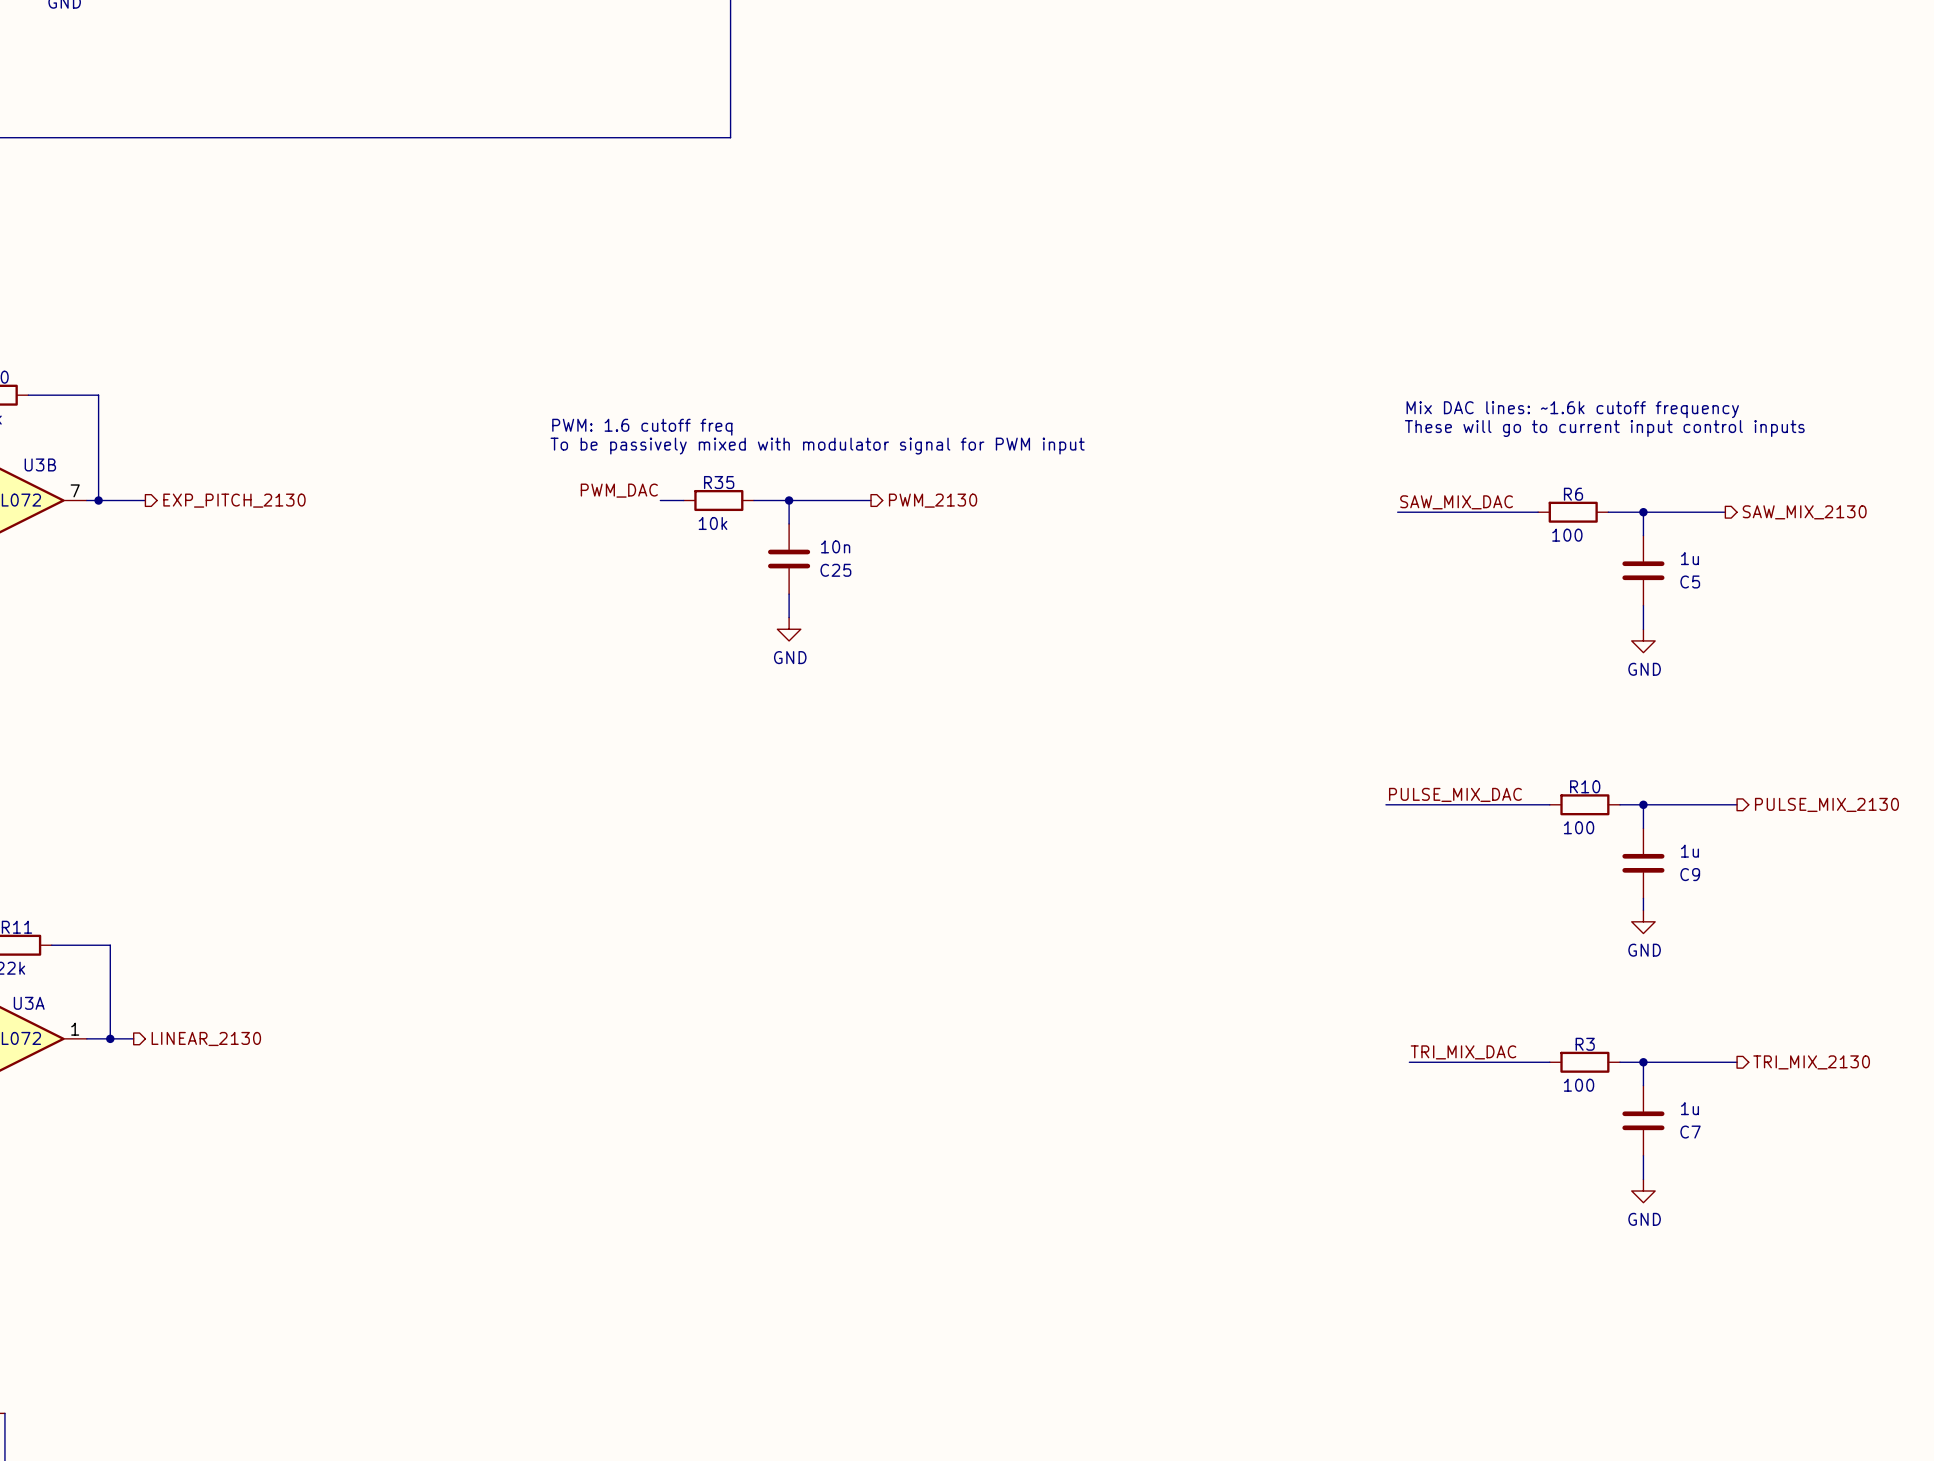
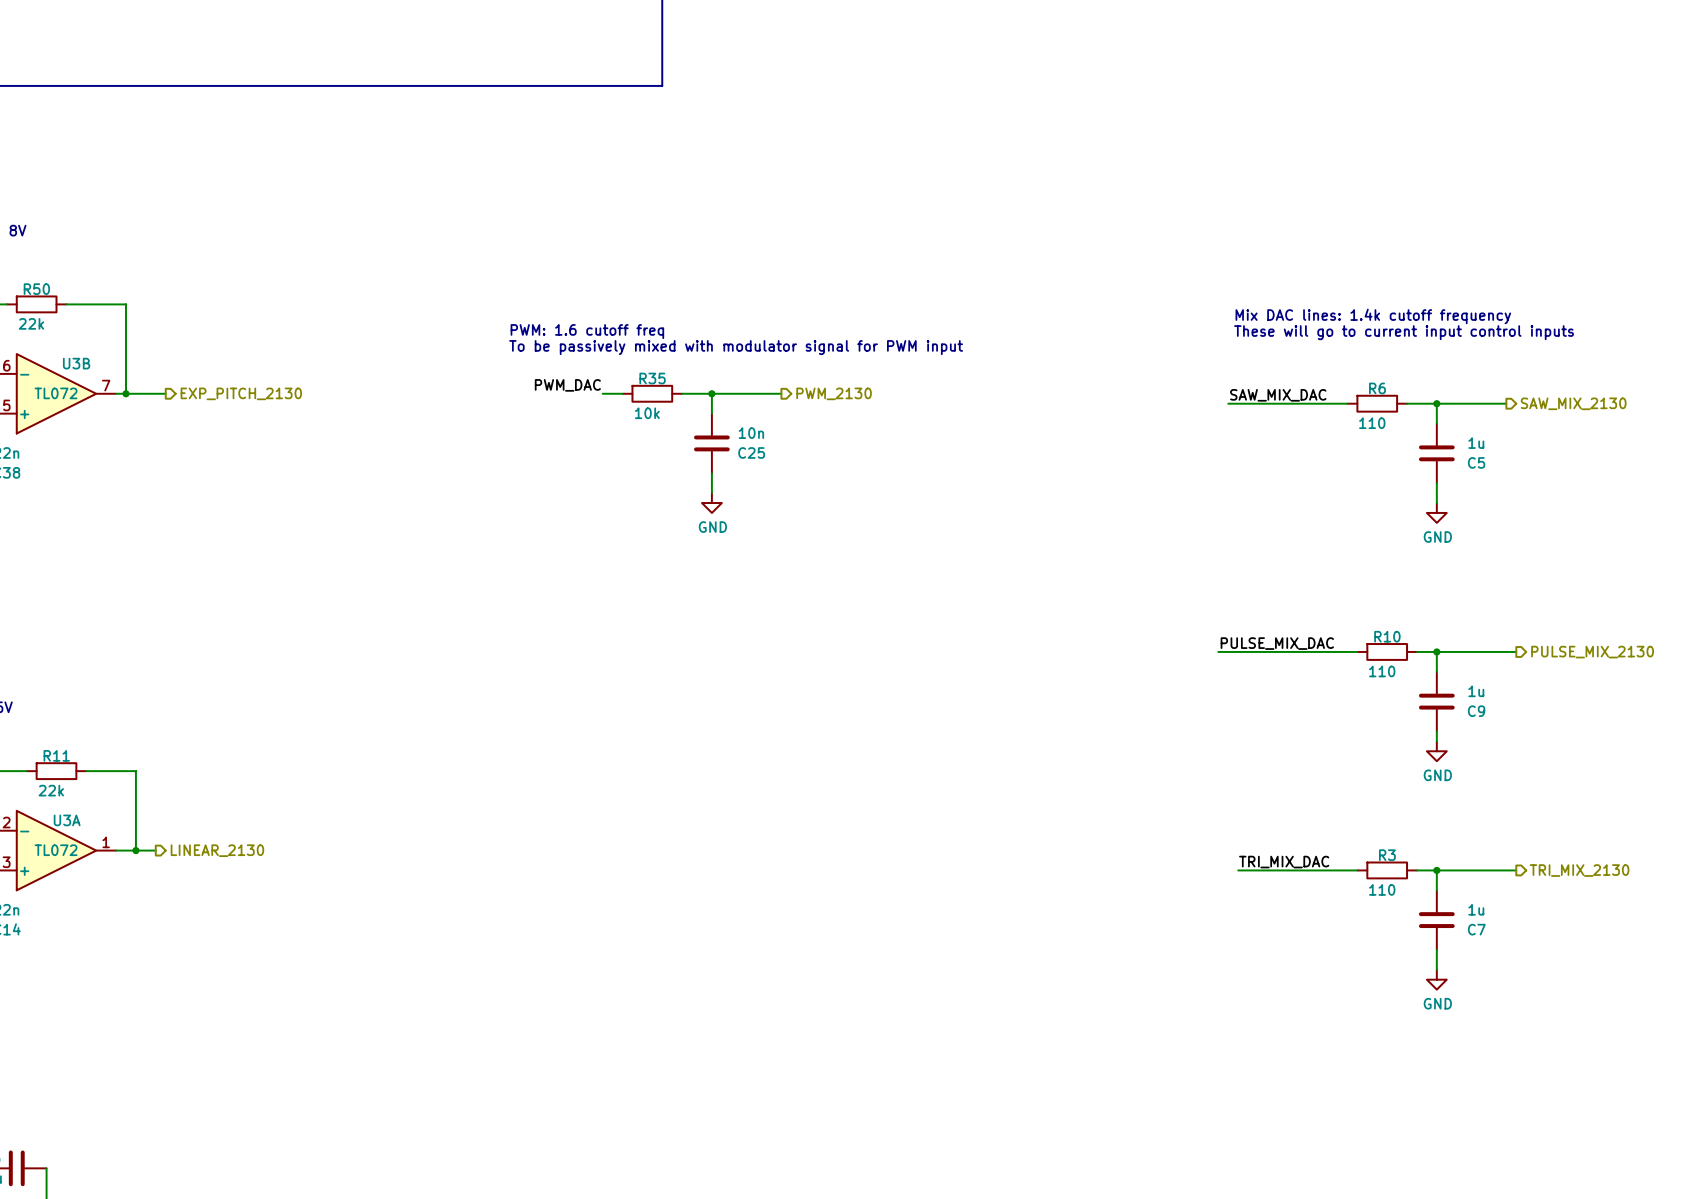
text: Mix DAC lines: ~1.6k cutoff frequency (1572, 409) -> Mix DAC lines: 1.4k cutoff frequency (1373, 316)
R6 value: 100 (1567, 535) -> 110 (1372, 423)
R10 value: 100 (1579, 827) -> 110 (1382, 671)
R3 value: 100 (1579, 1085) -> 110 (1382, 889)

